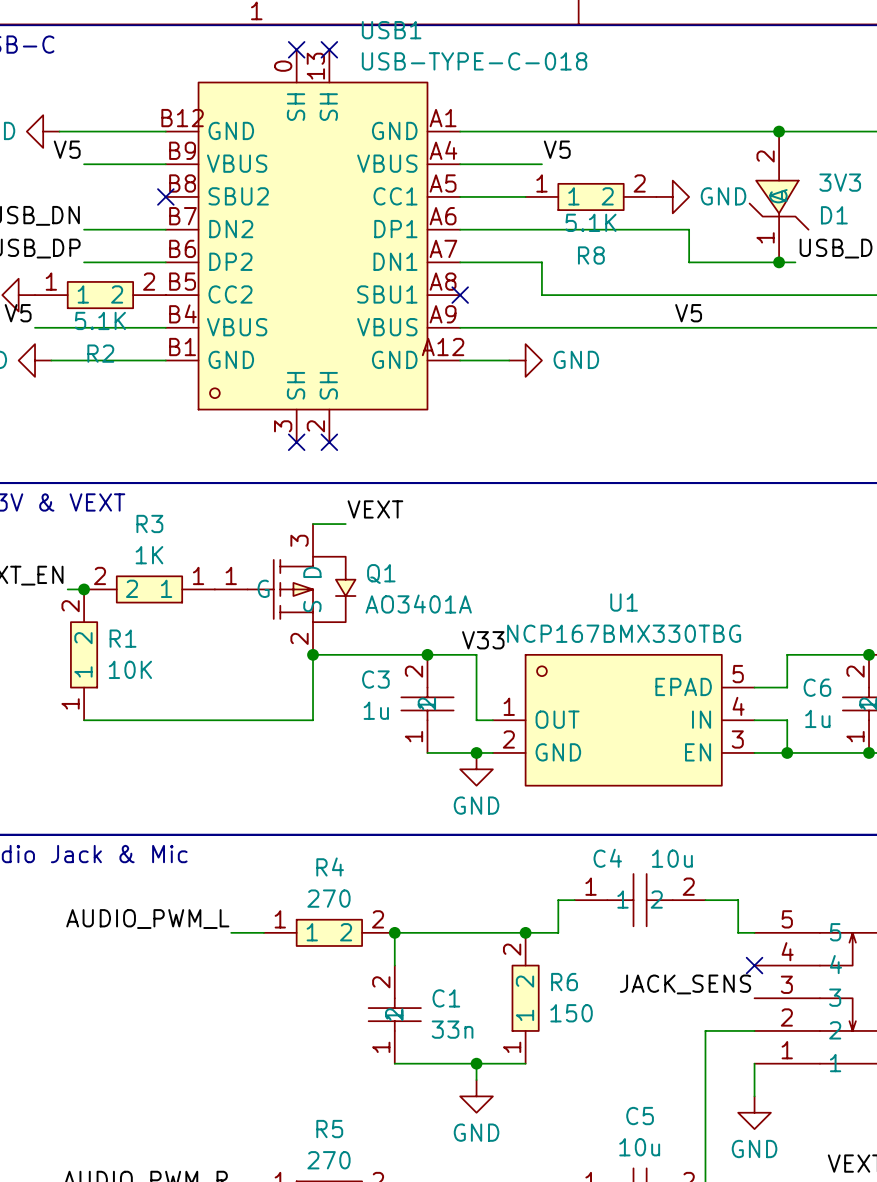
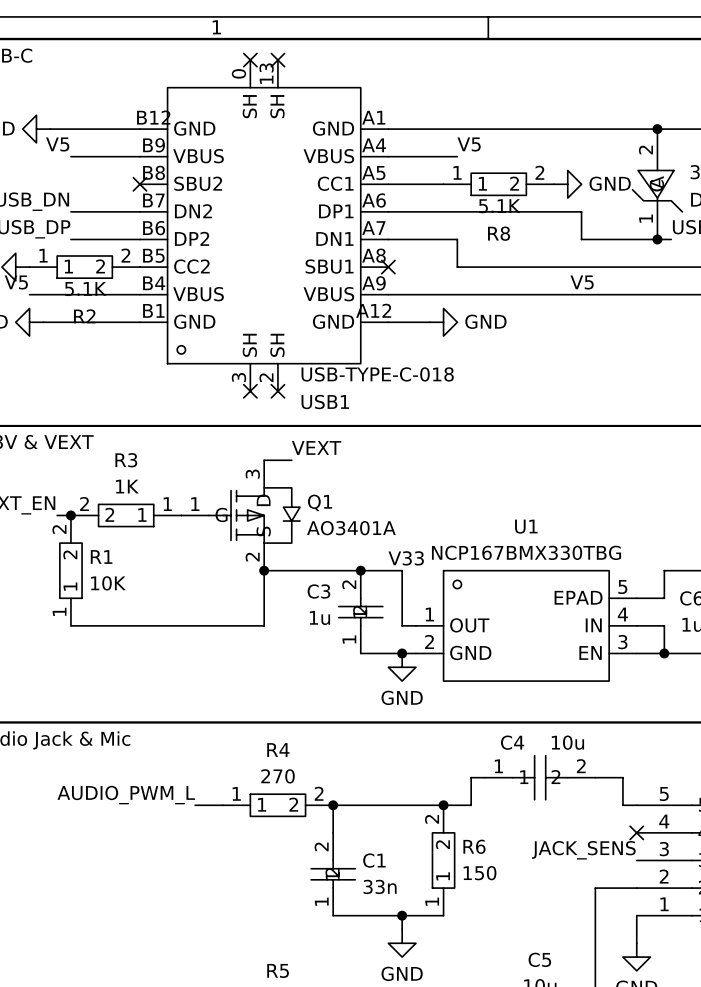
USB1 name position: USB1 (391, 30) -> USB1 (325, 402)
USB1 value position: USB-TYPE-C-018 (474, 61) -> USB-TYPE-C-018 (377, 374)

